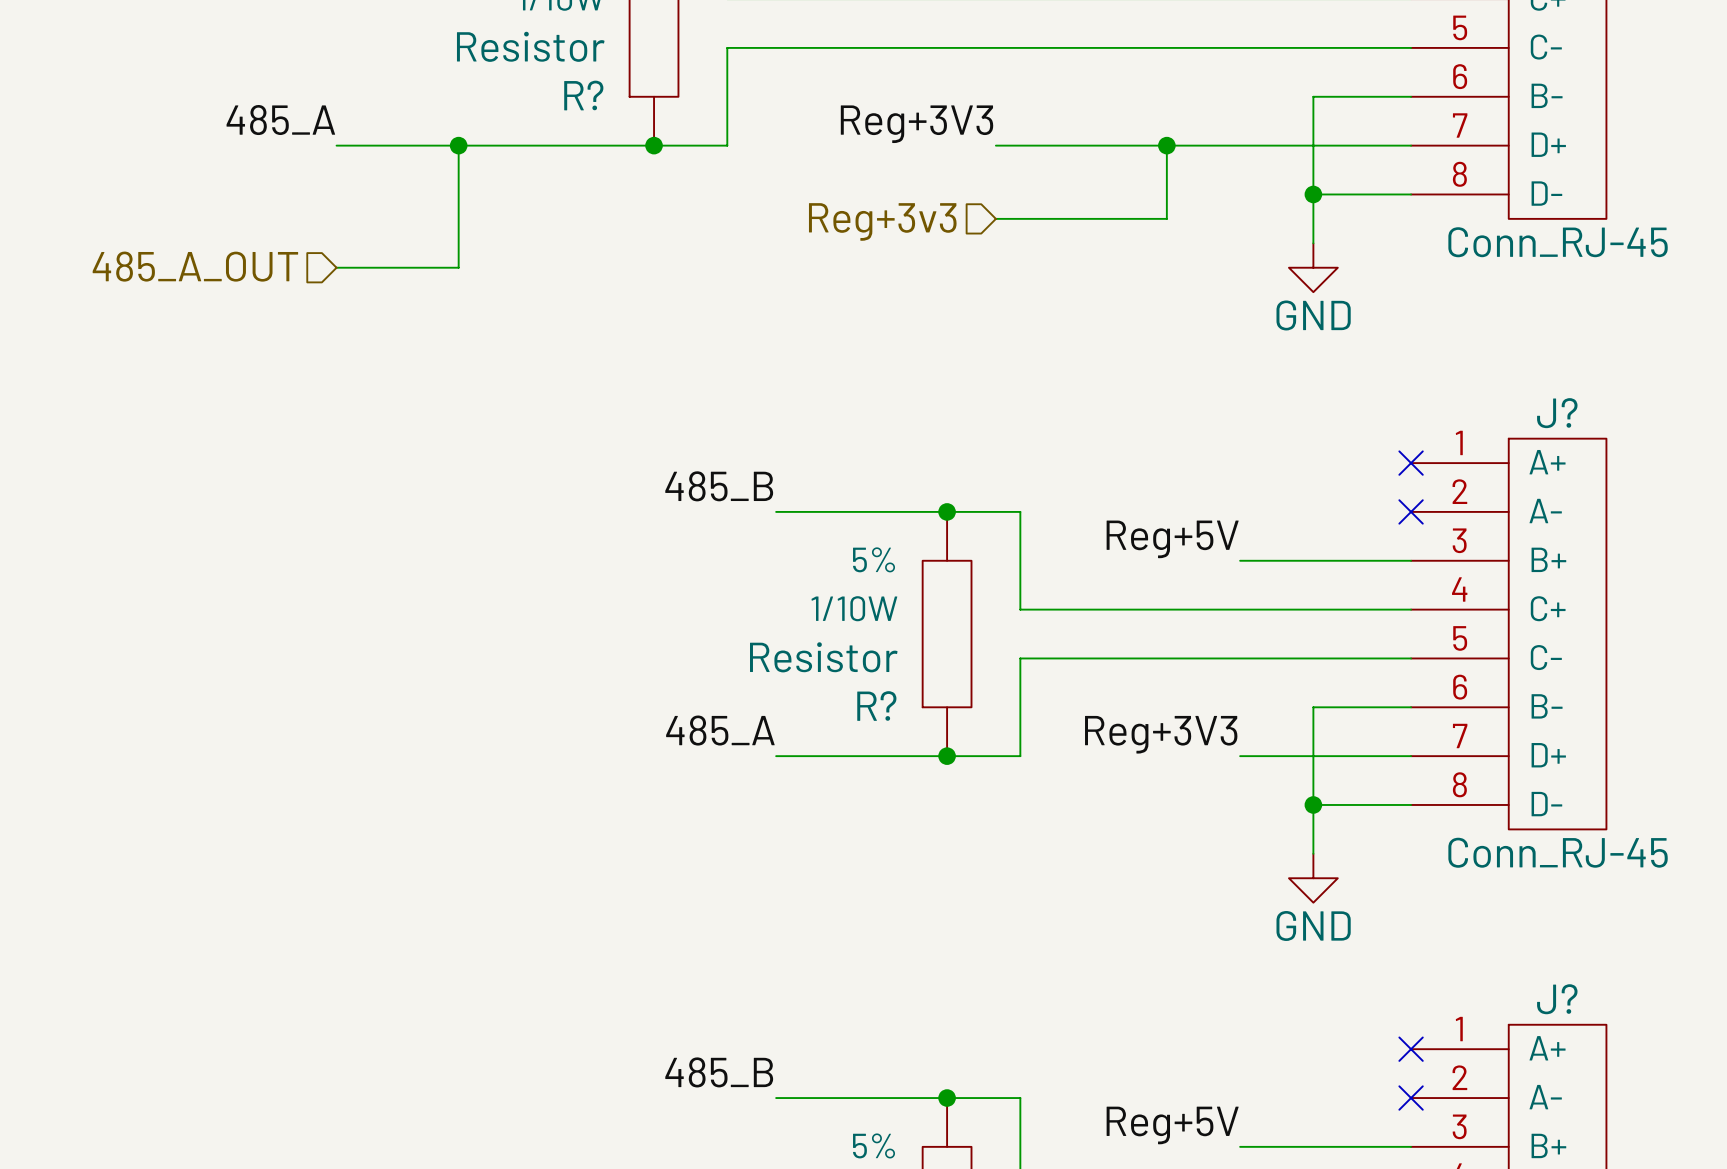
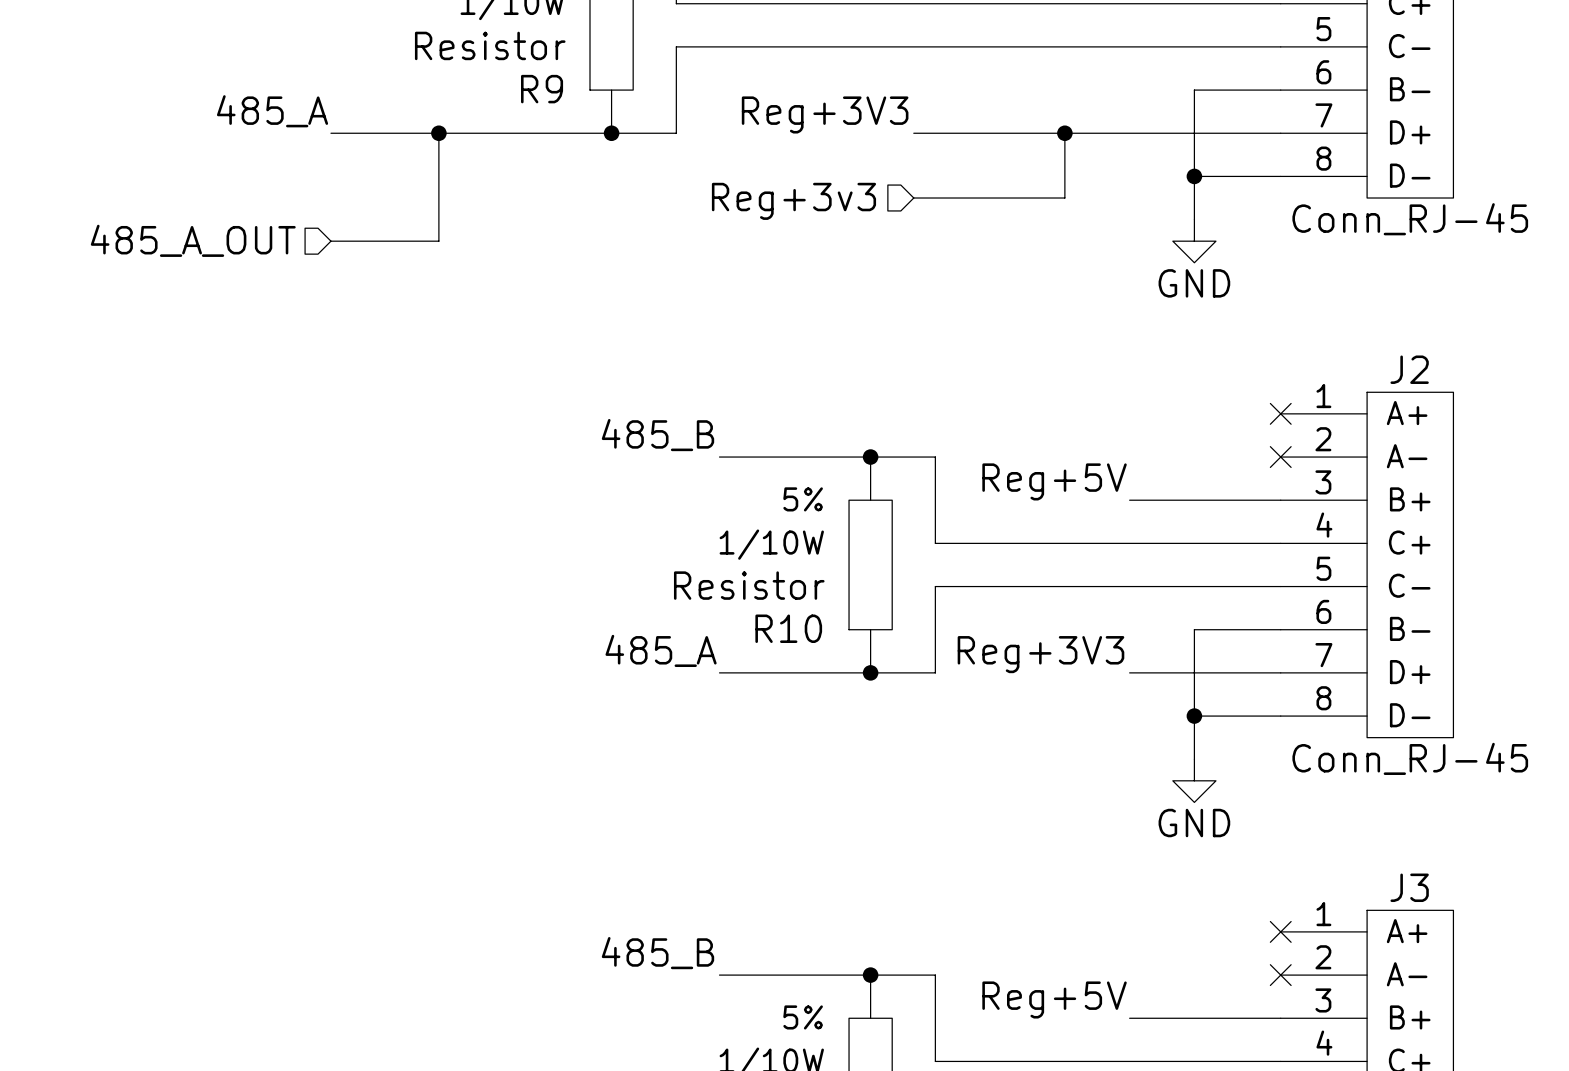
R? name: R? (583, 95) -> R9 (542, 89)
J? name: J? (1557, 413) -> J2 (1409, 369)
R? name: R? (876, 706) -> R10 (788, 628)
J? name: J? (1557, 999) -> J3 (1409, 887)

